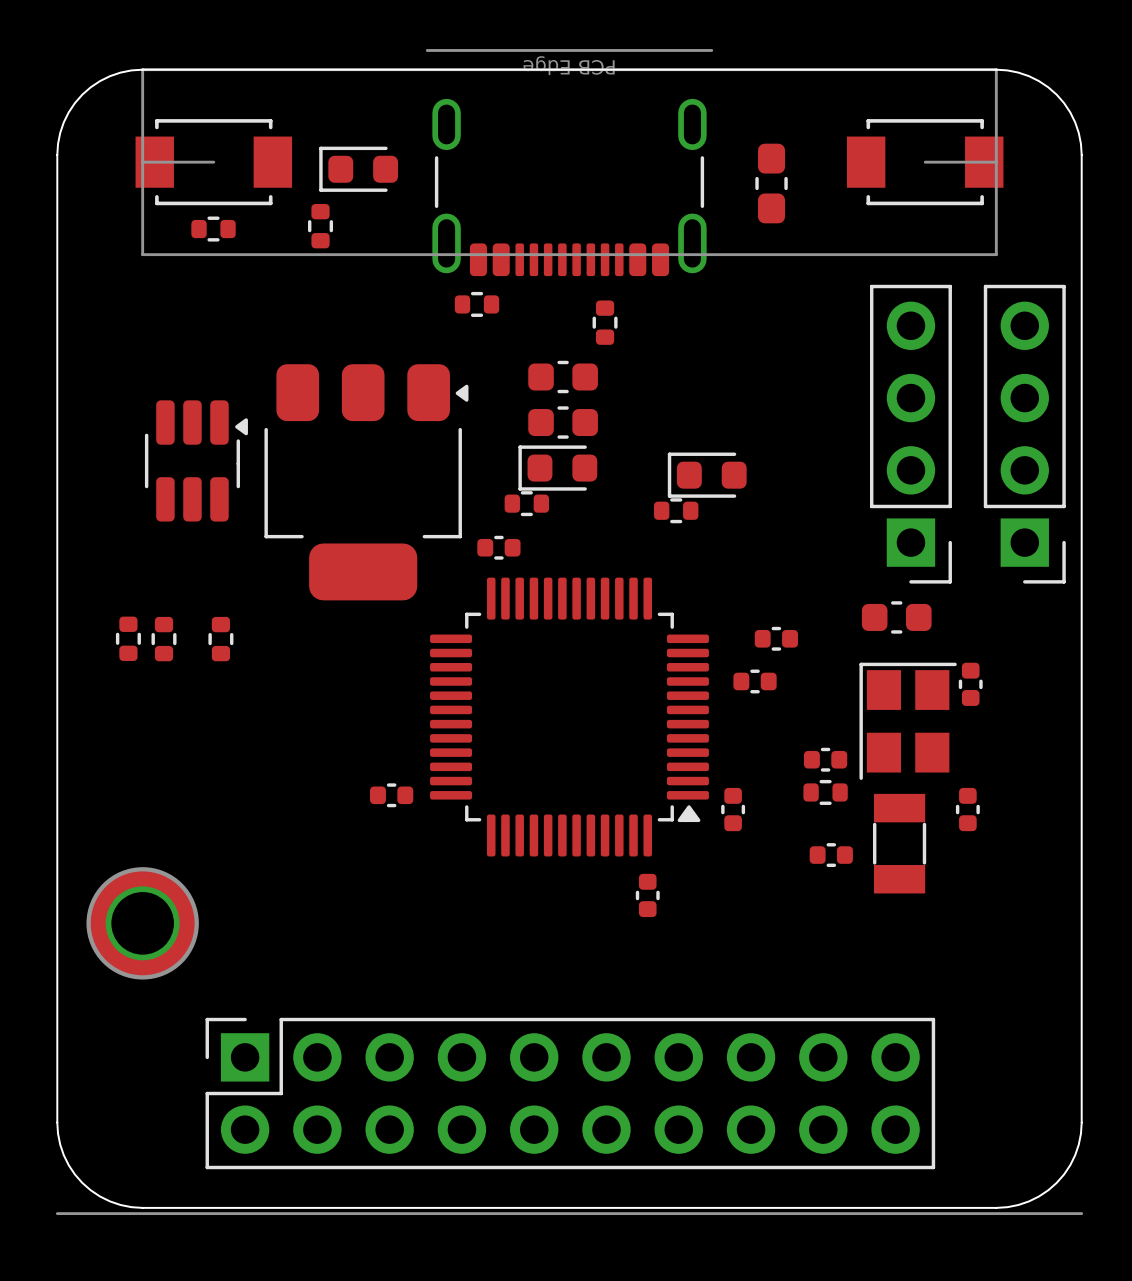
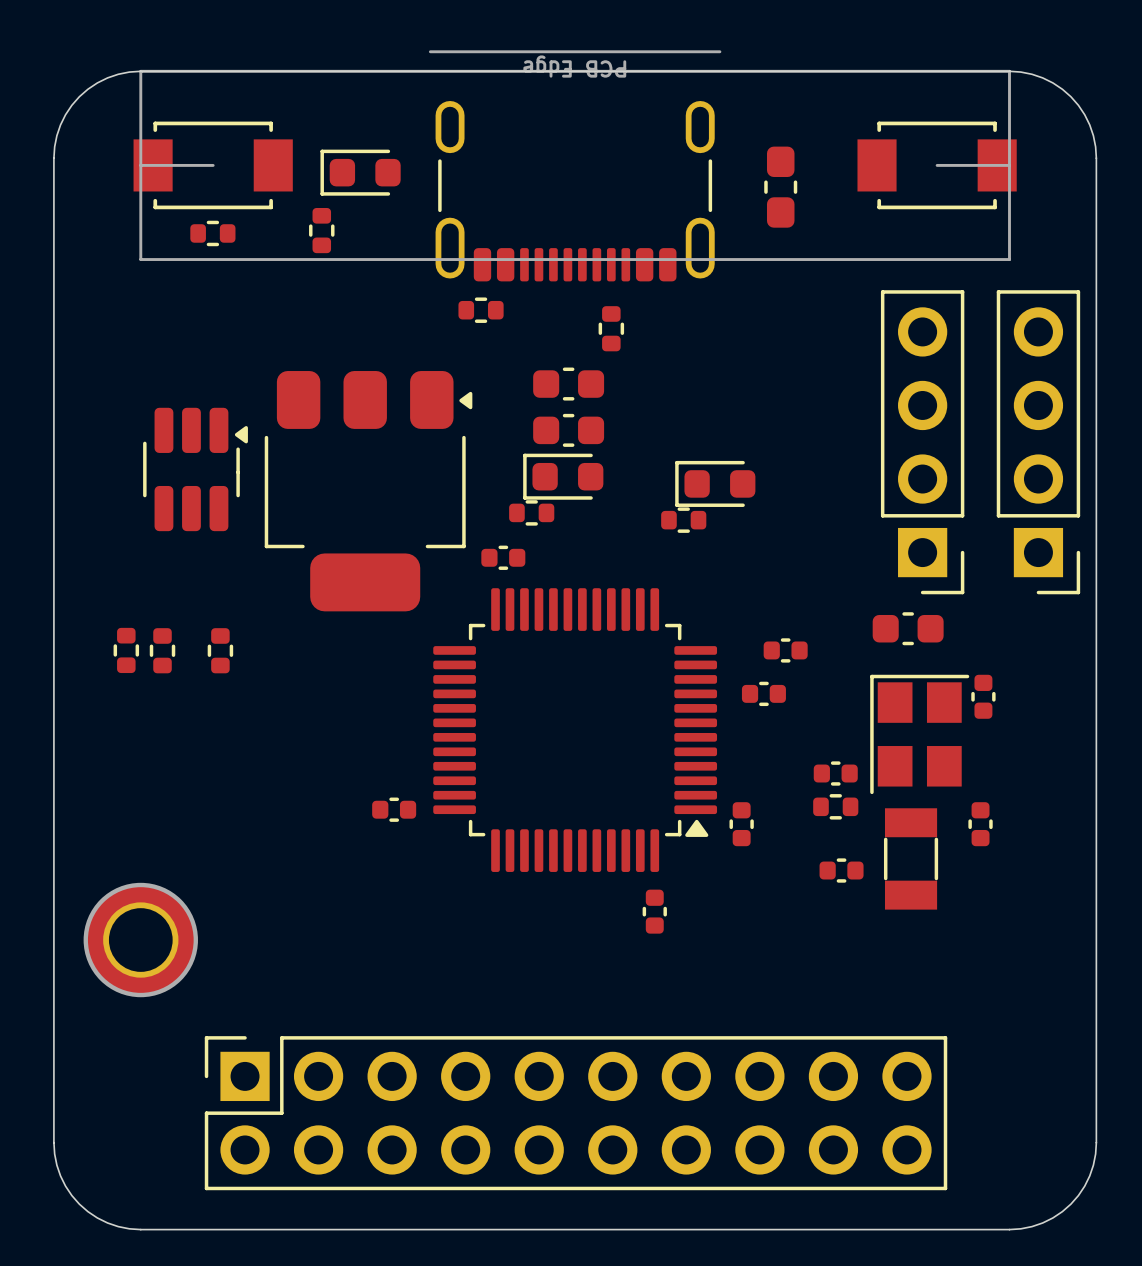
line: (57, 1213) (1081, 1213) -> none

